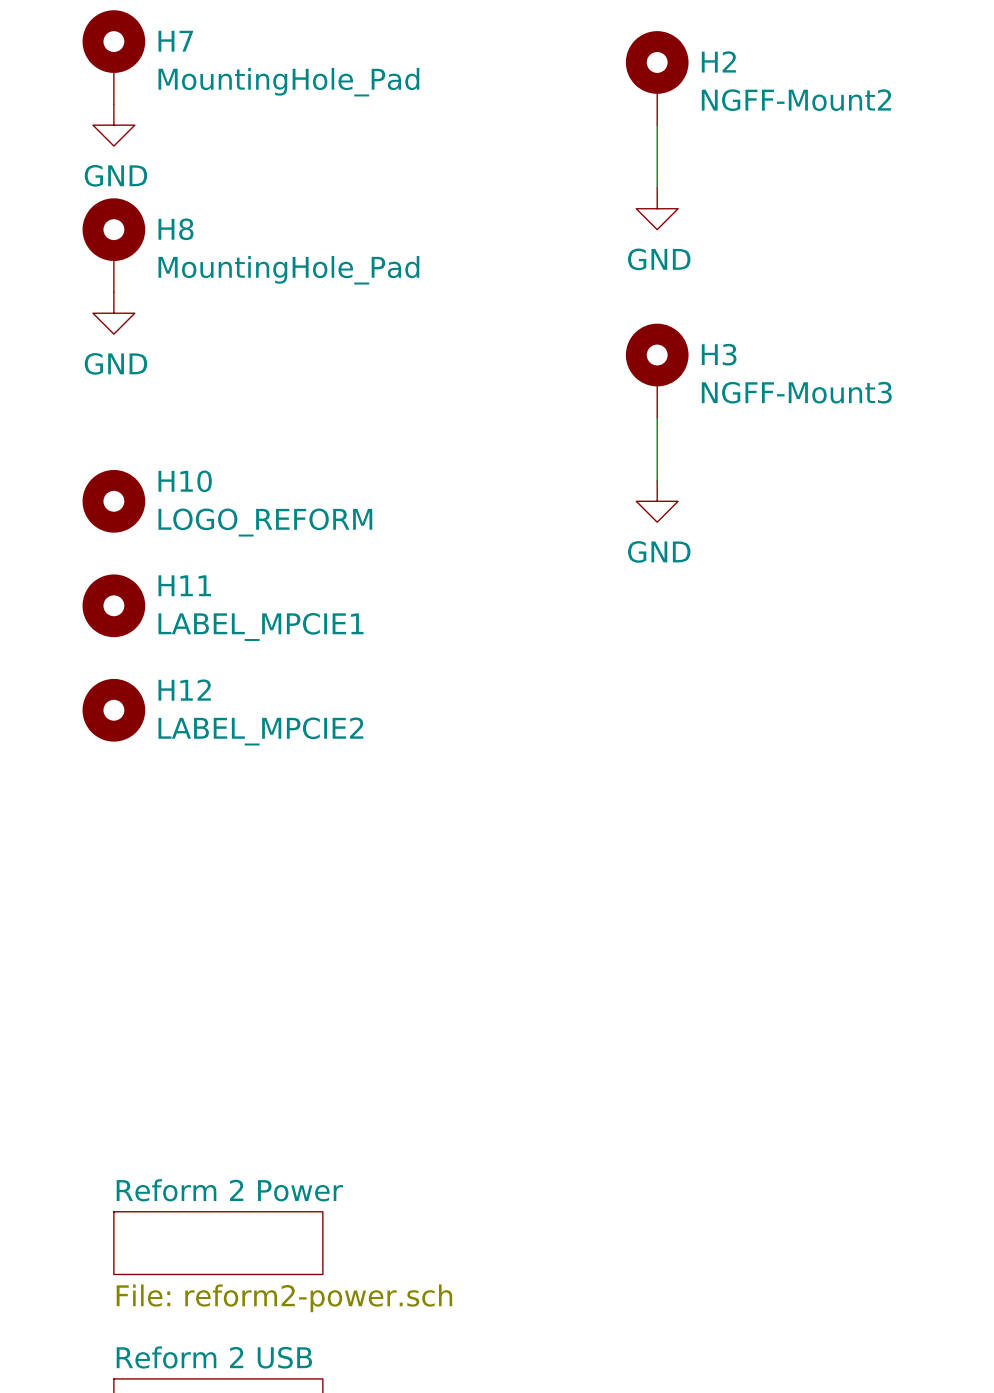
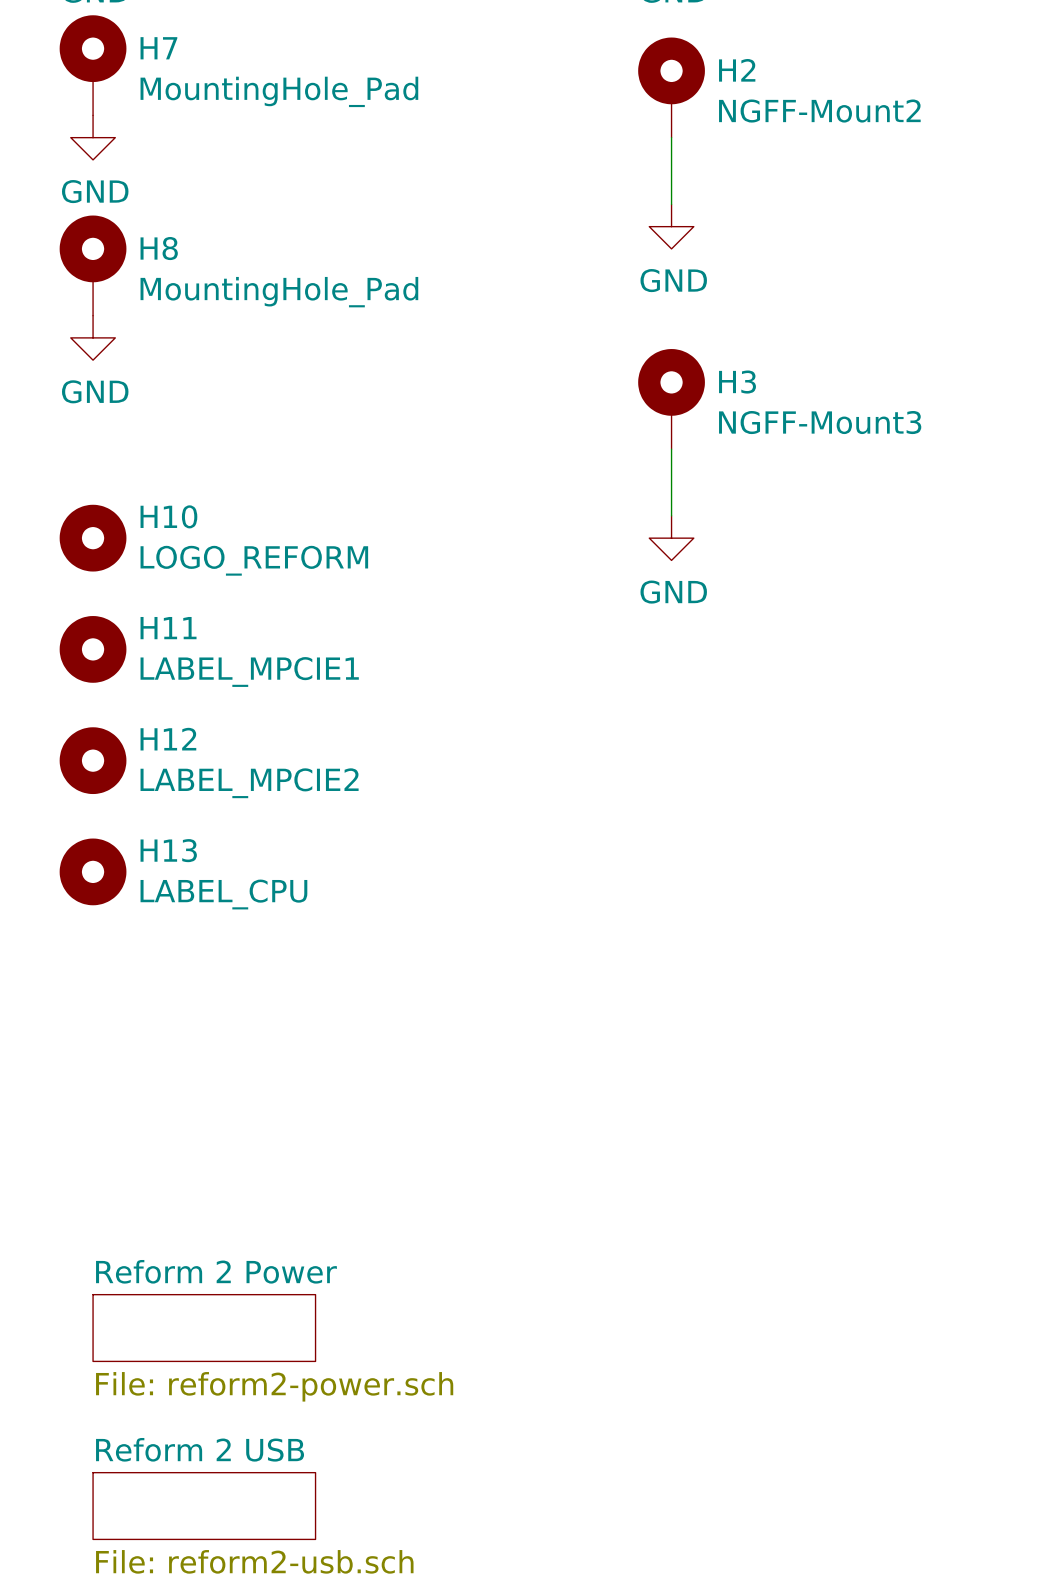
H13: none -> LABEL_CPU (93, 871)

